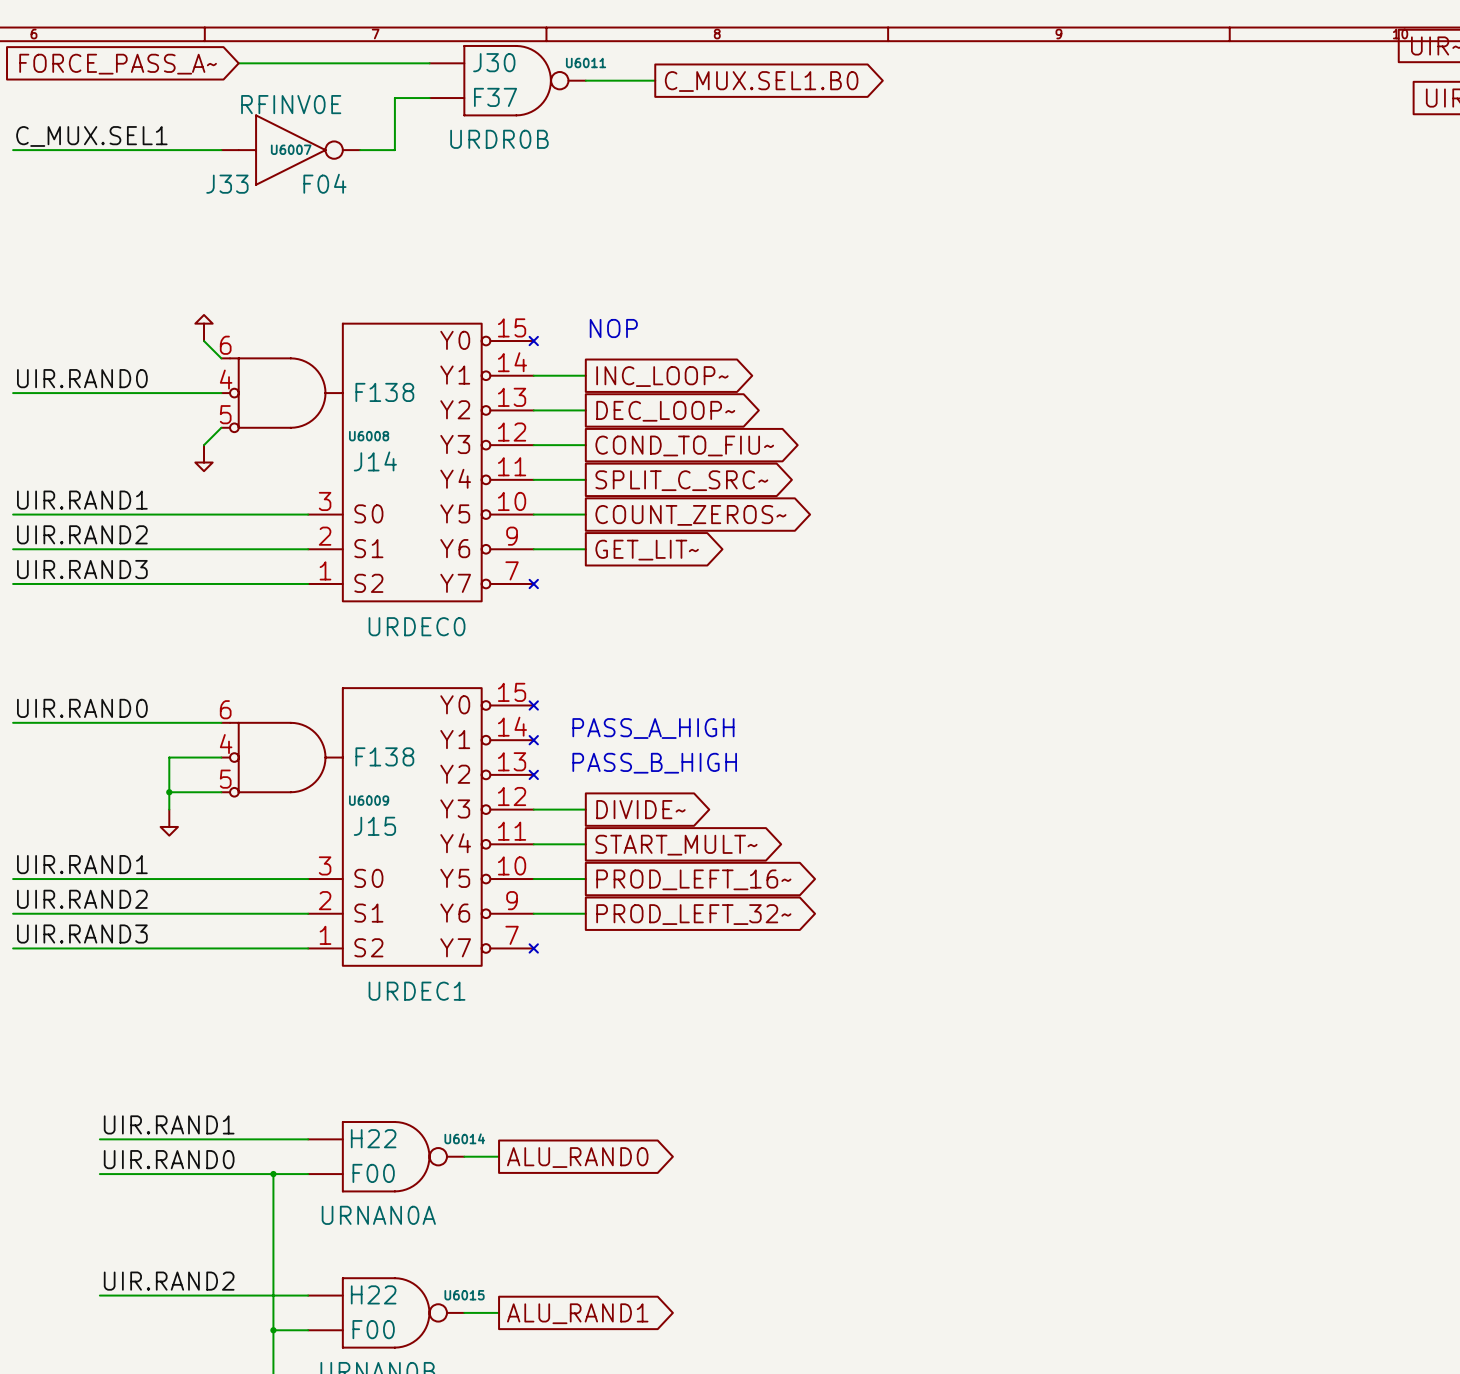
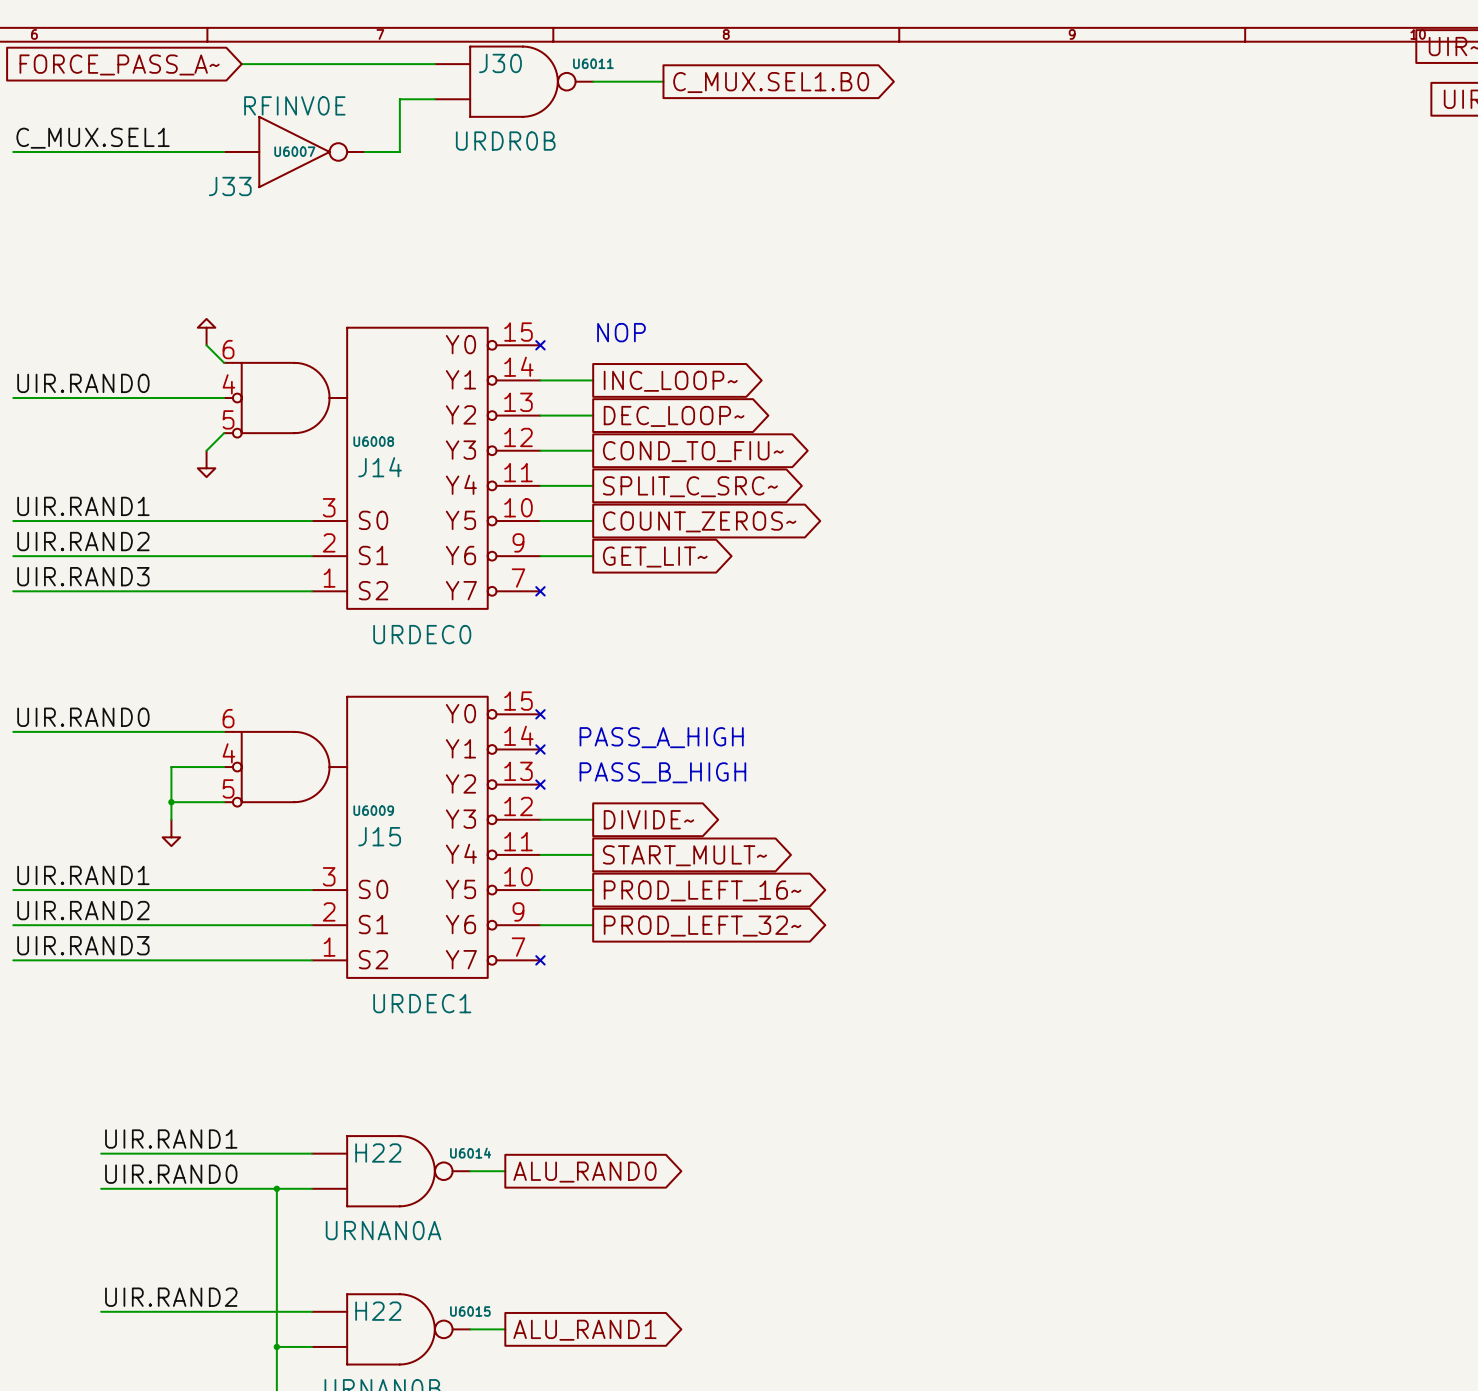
U6011 value: F37 (495, 97) -> none
U6007 value: F04 (324, 183) -> none
U6008 value: F138 (384, 392) -> none
U6009 value: F138 (384, 756) -> none
U6014 value: F00 (373, 1173) -> none
U6015 value: F00 (373, 1329) -> none

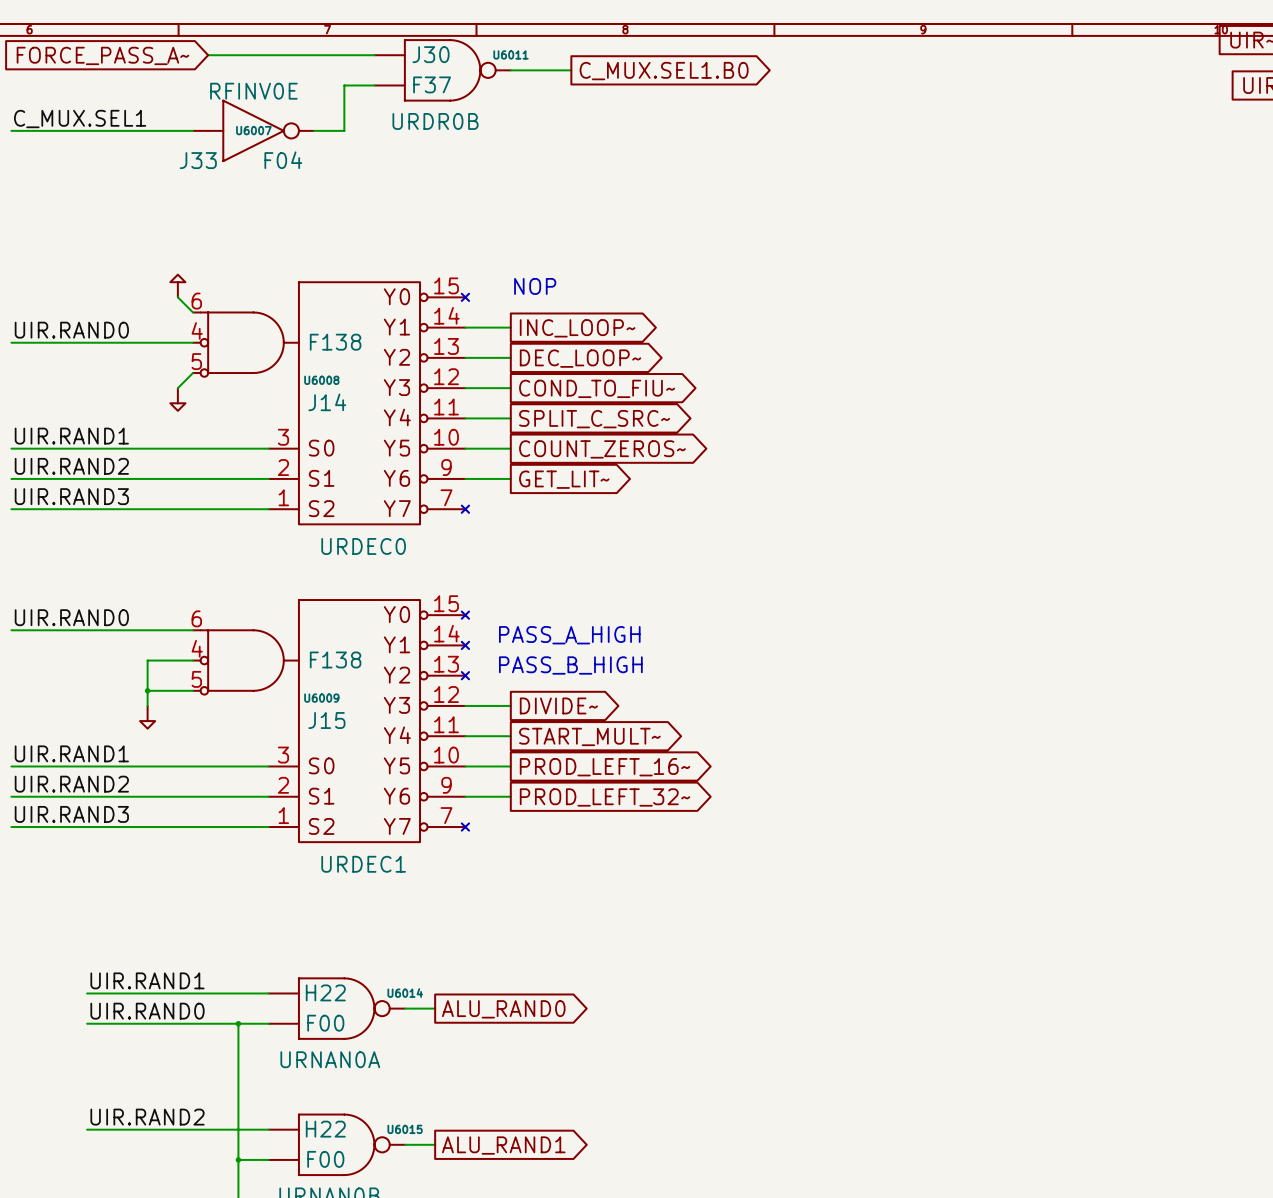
U6011 value: none -> F37 (432, 84)
U6007 value: none -> F04 (283, 160)
U6008 value: none -> F138 (335, 342)
U6009 value: none -> F138 (335, 659)
U6014 value: none -> F00 (325, 1023)
U6015 value: none -> F00 (325, 1159)

